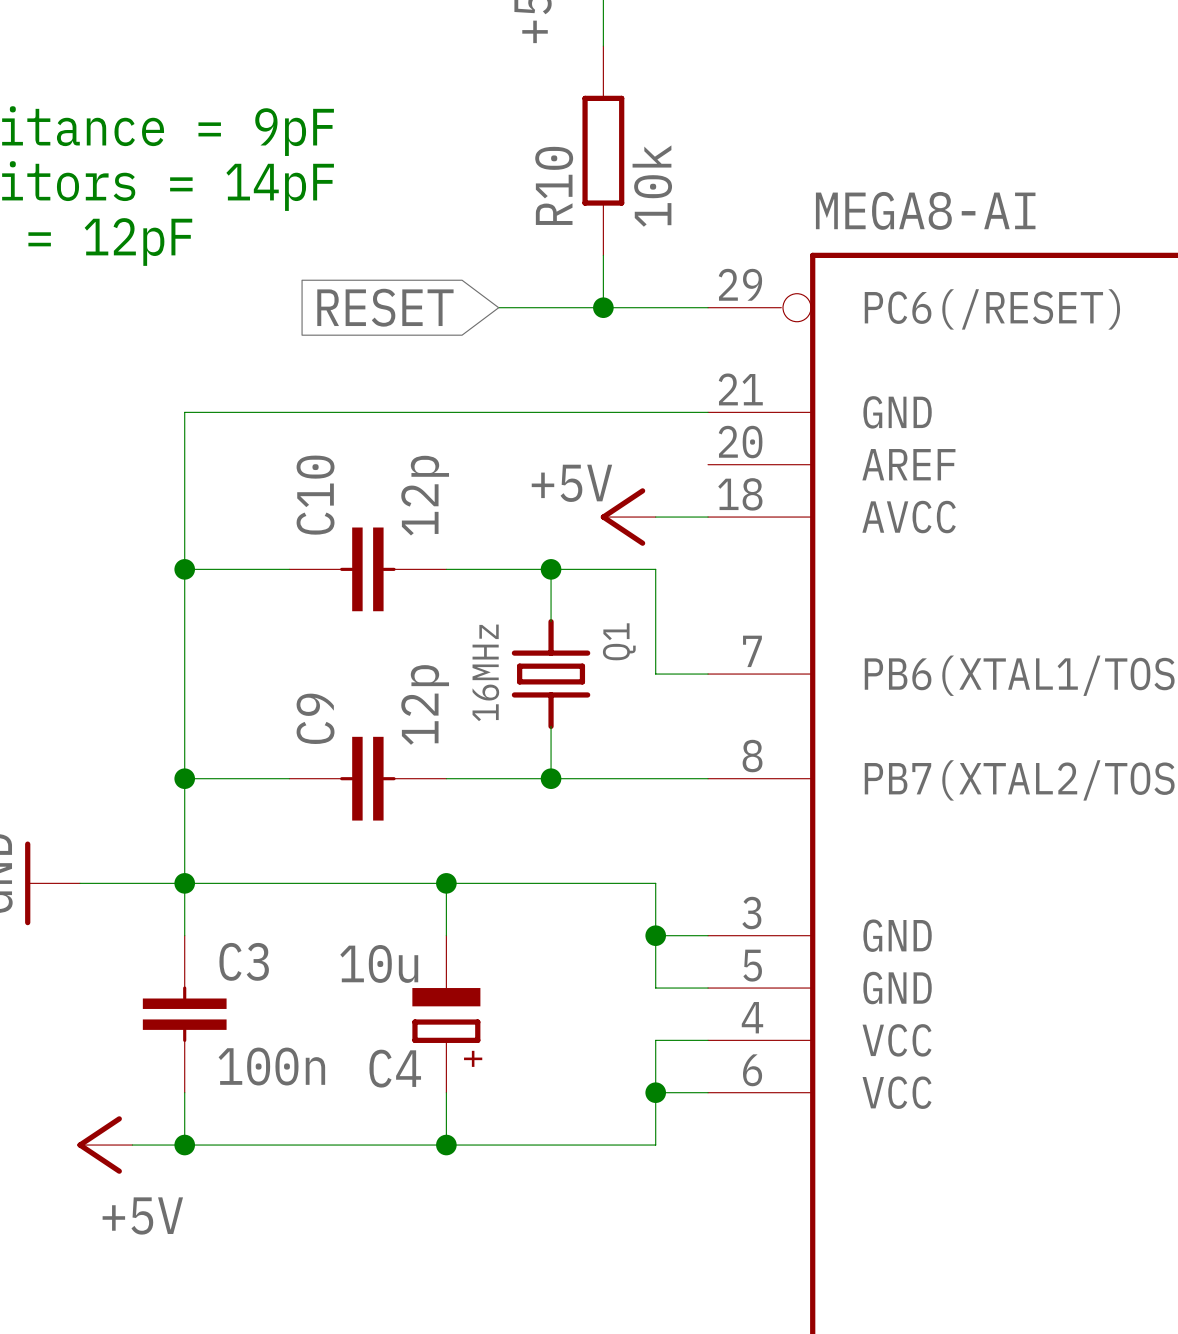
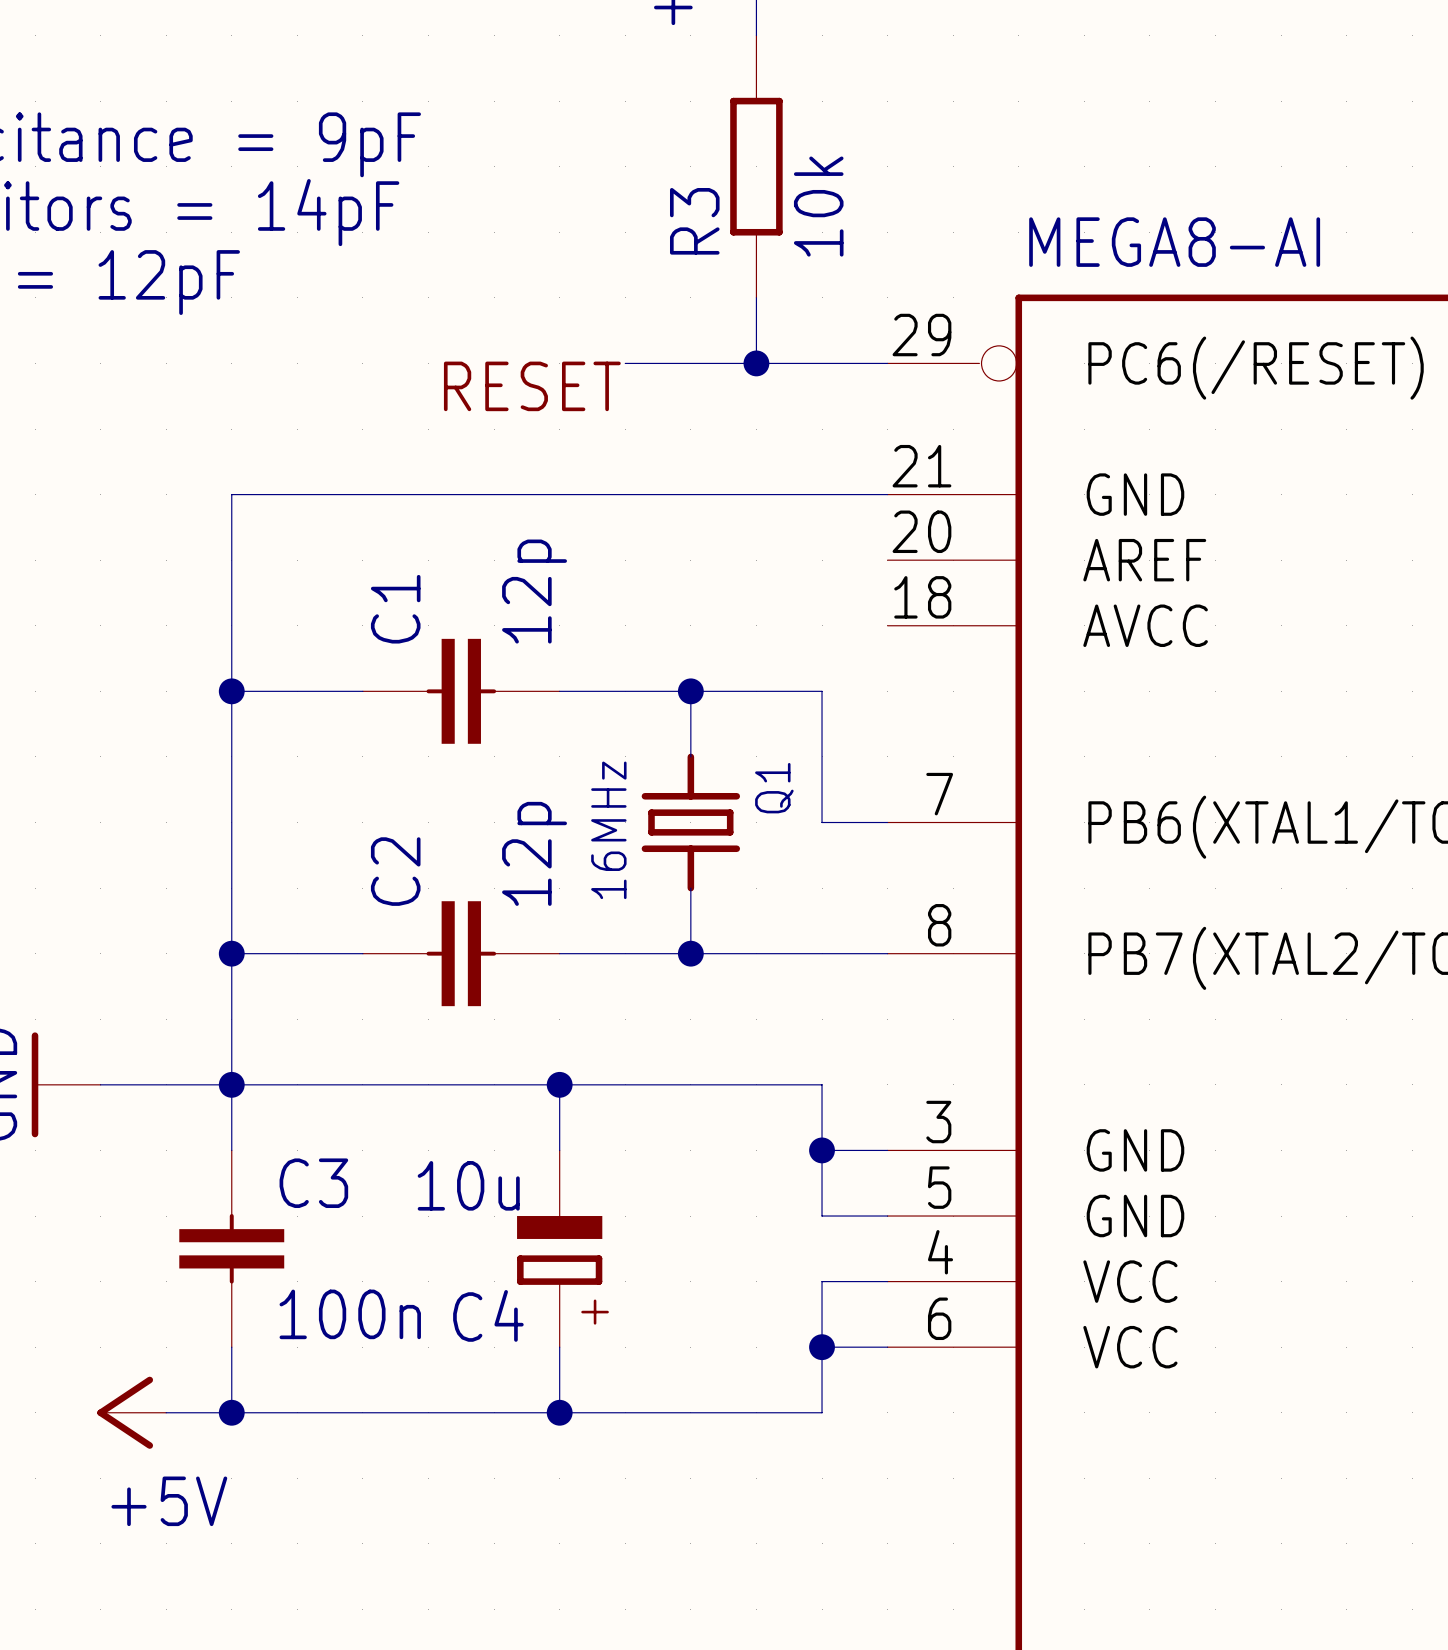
R10 name: R10 (554, 185) -> R3 (694, 221)
global label: RESET (385, 307) -> none
label: none -> RESET (532, 386)
C10 name: C10 (315, 495) -> C1 (395, 609)
power symbol: +5V (628, 517) -> none
wire: (655, 517) (708, 517) -> none
C9 name: C9 (315, 718) -> C2 (395, 871)

